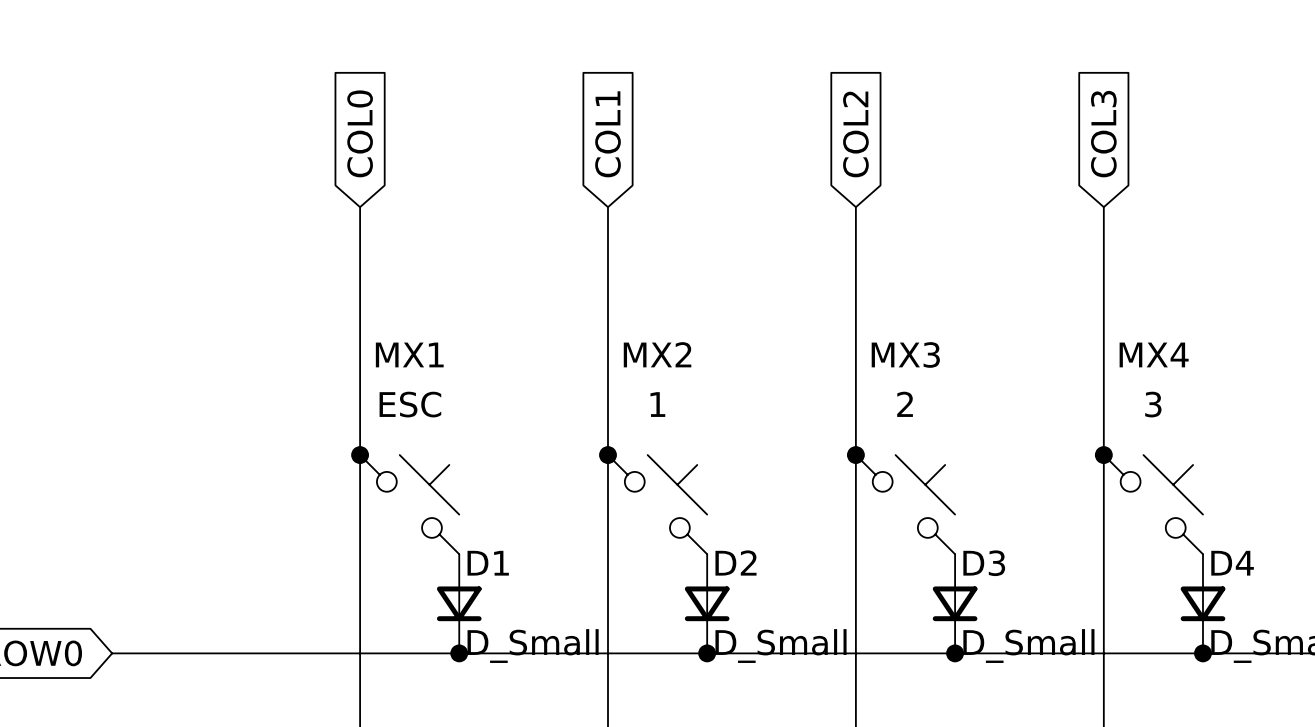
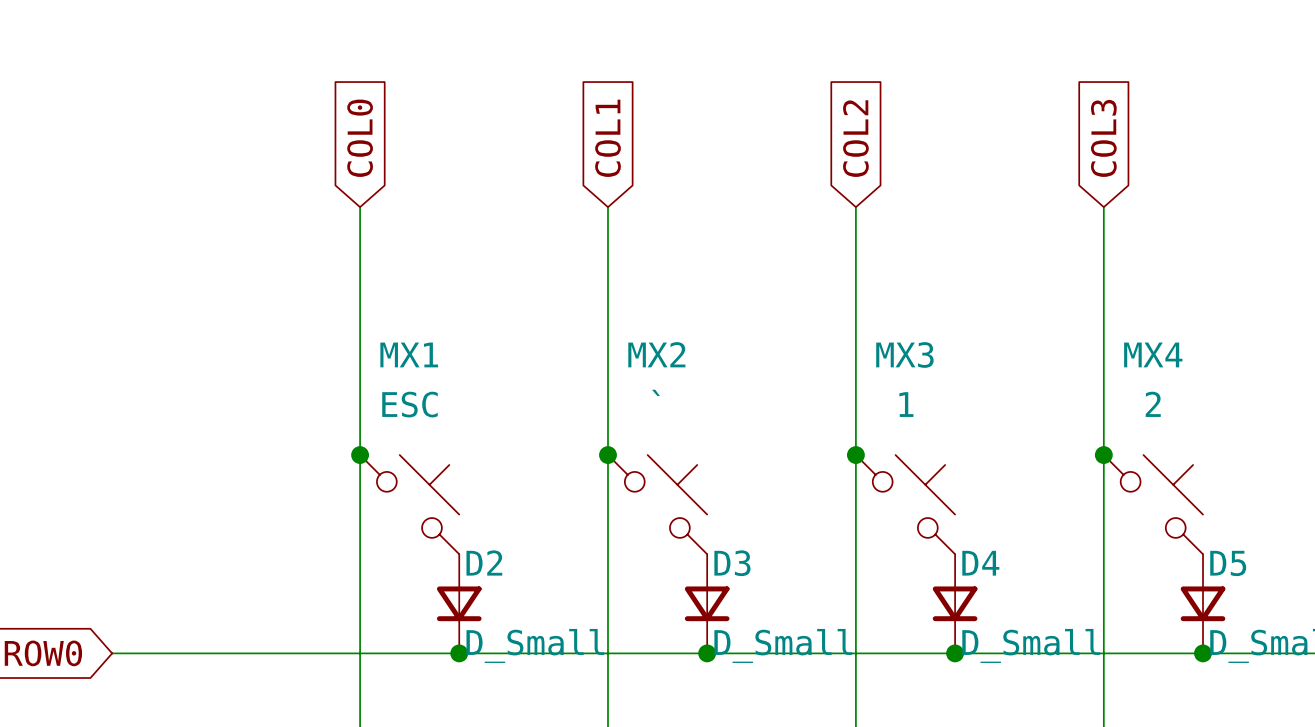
MX2 value: 1 (657, 404) -> ` (655, 392)
MX3 value: 2 (905, 404) -> 1 (906, 404)
MX4 value: 3 (1153, 404) -> 2 (1153, 404)
D2 name: D2 (736, 562) -> D3 (732, 563)
D1 name: D1 (488, 563) -> D2 (484, 562)
D3 name: D3 (984, 563) -> D4 (980, 563)
D4 name: D4 (1232, 563) -> D5 (1228, 563)

